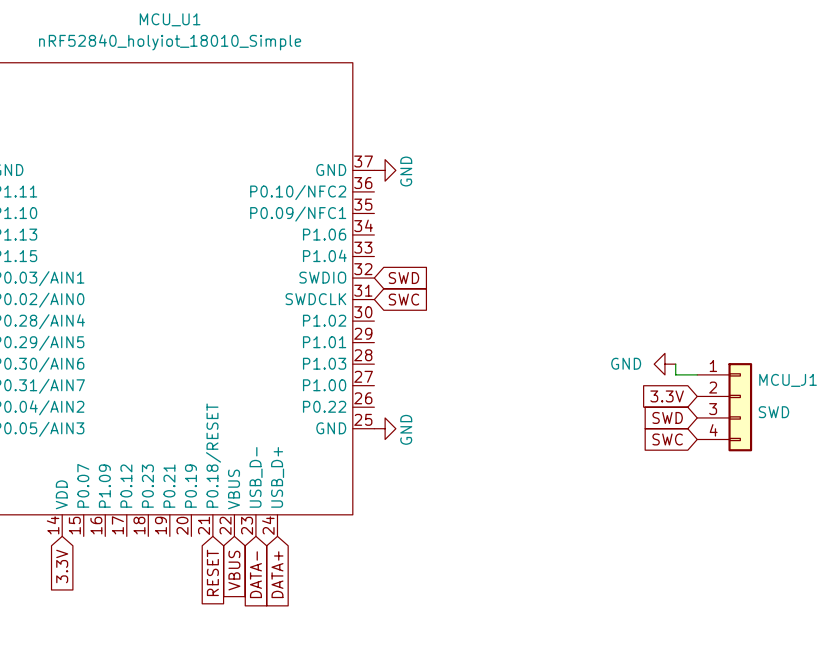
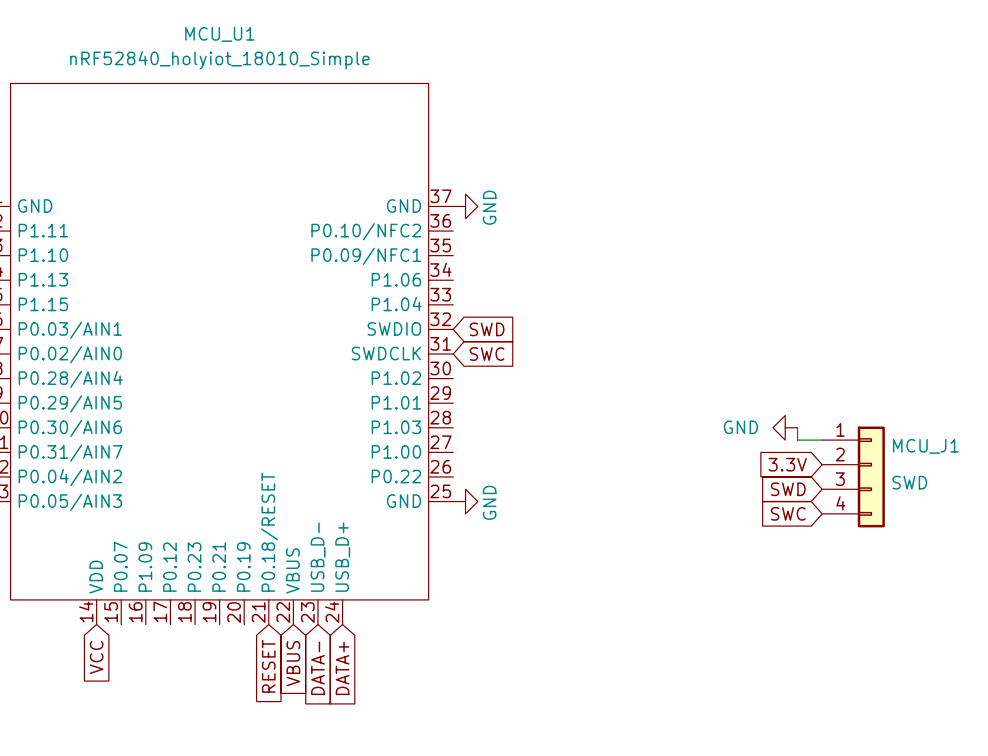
global label: 3.3V (62, 566) -> VCC (96, 657)

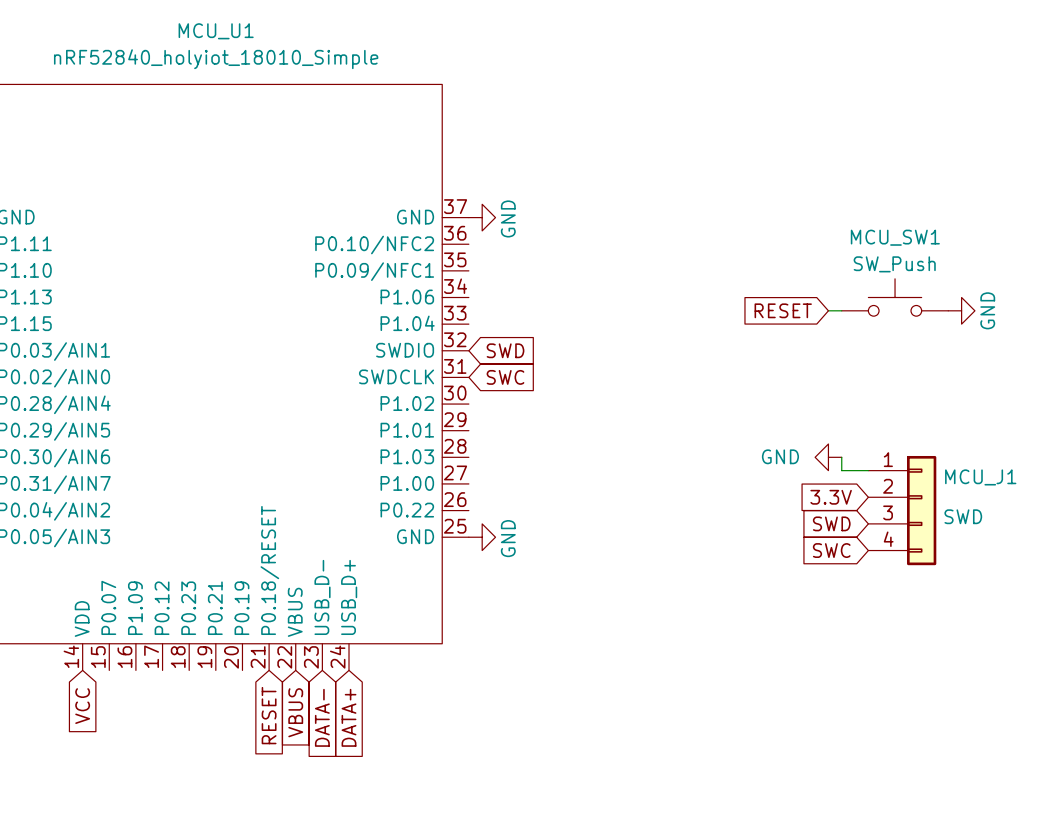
MCU_SW1: none -> SW_Push (895, 297)
global label: none -> RESET (783, 310)
wire: none -> (828, 310) (841, 310)
power symbol: none -> GND (961, 310)

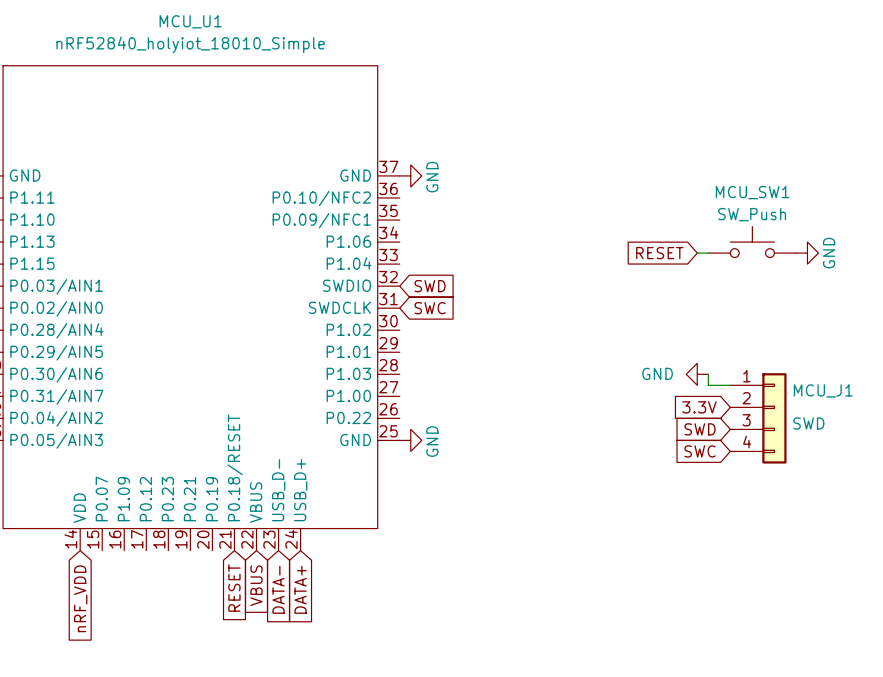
global label: VCC (82, 706) -> nRF_VDD (80, 598)

